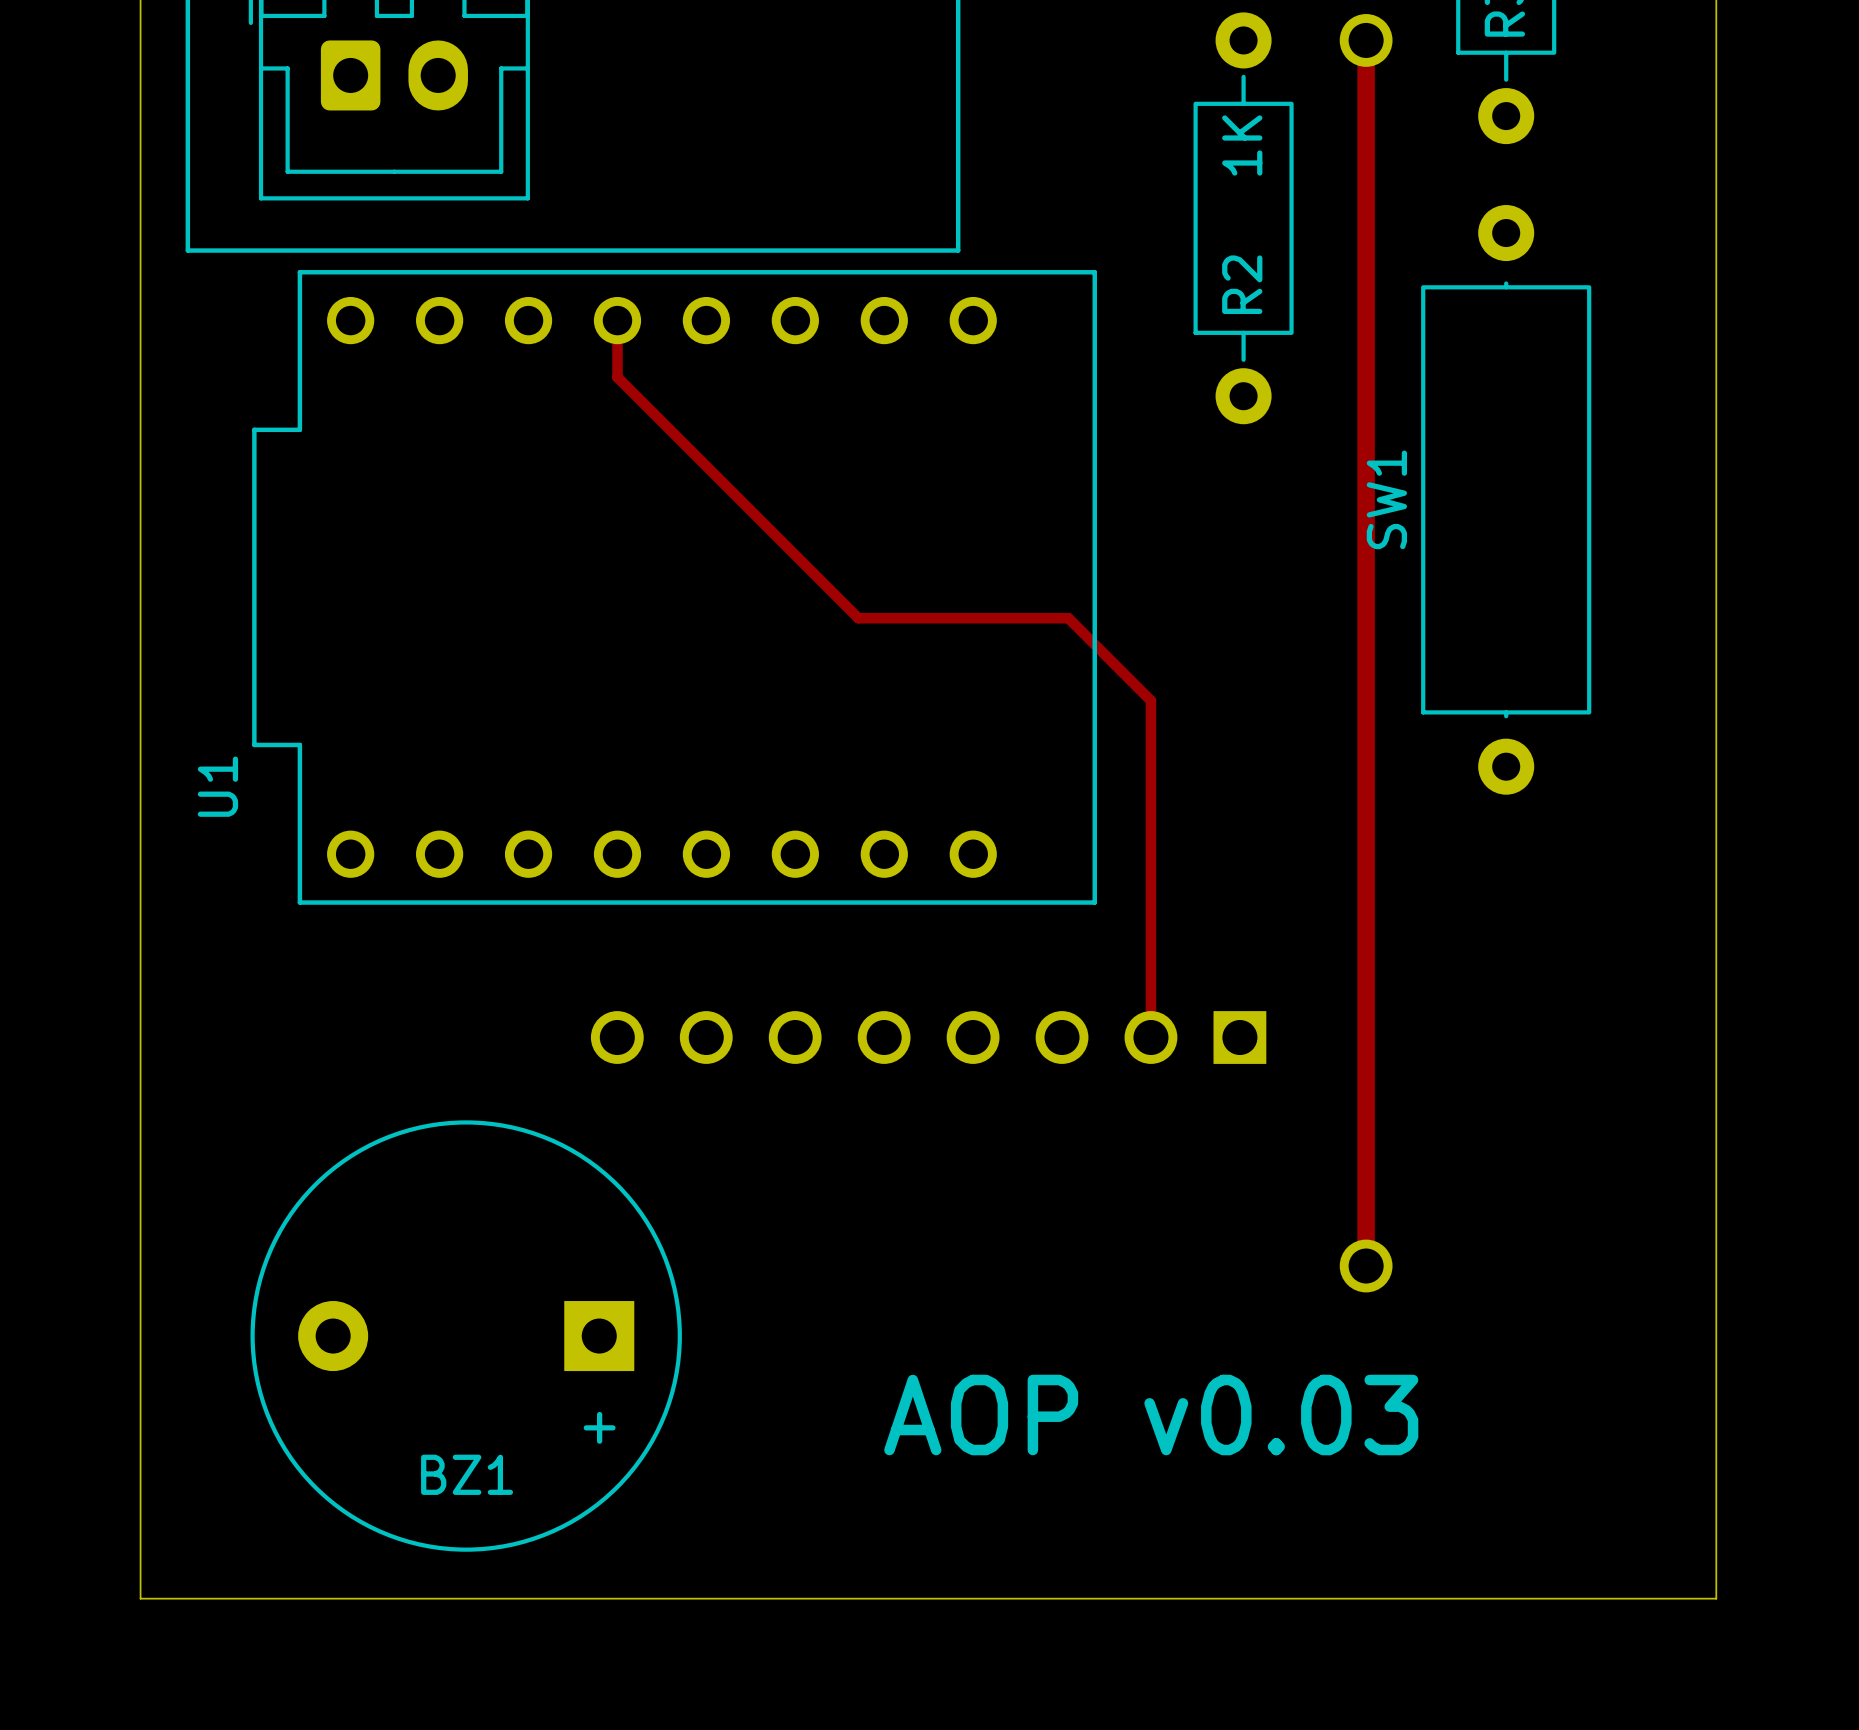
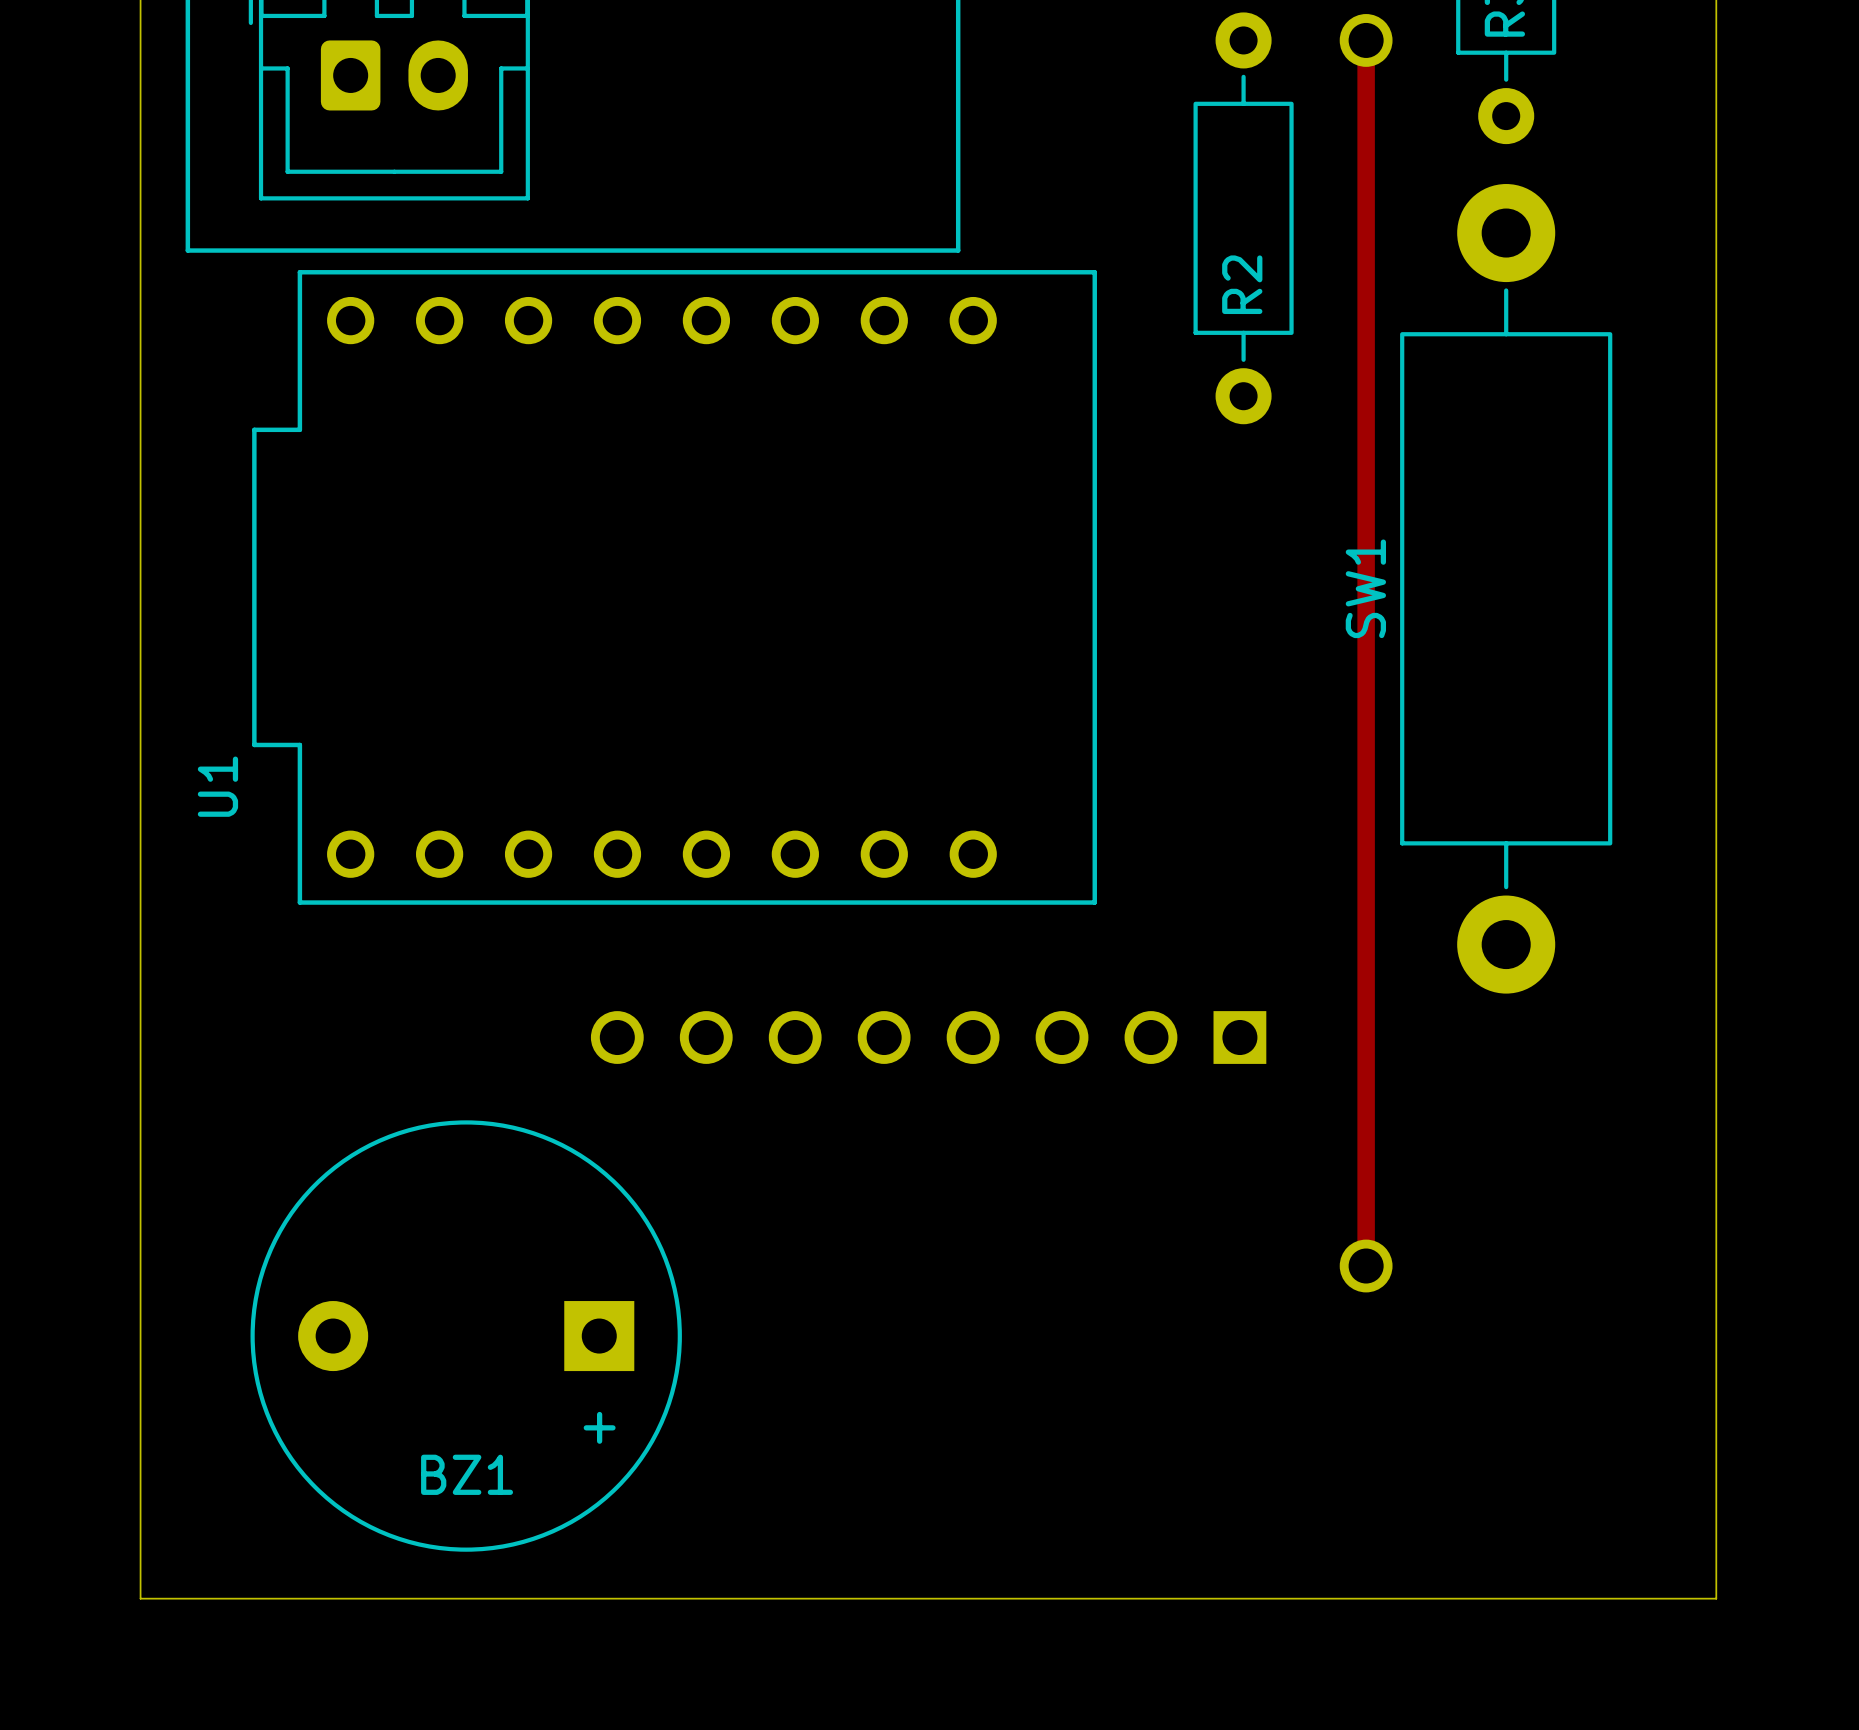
R2 value: 1K (1242, 145) -> none
SW1 footprint: [1421, 205, 1592, 795] -> [1400, 184, 1613, 994]
track: (617, 320) (617, 377) (858, 618) (1068, 618) (1150, 700) (1150, 1037) -> none
text: AOP v0.03 (1151, 1415) -> none

